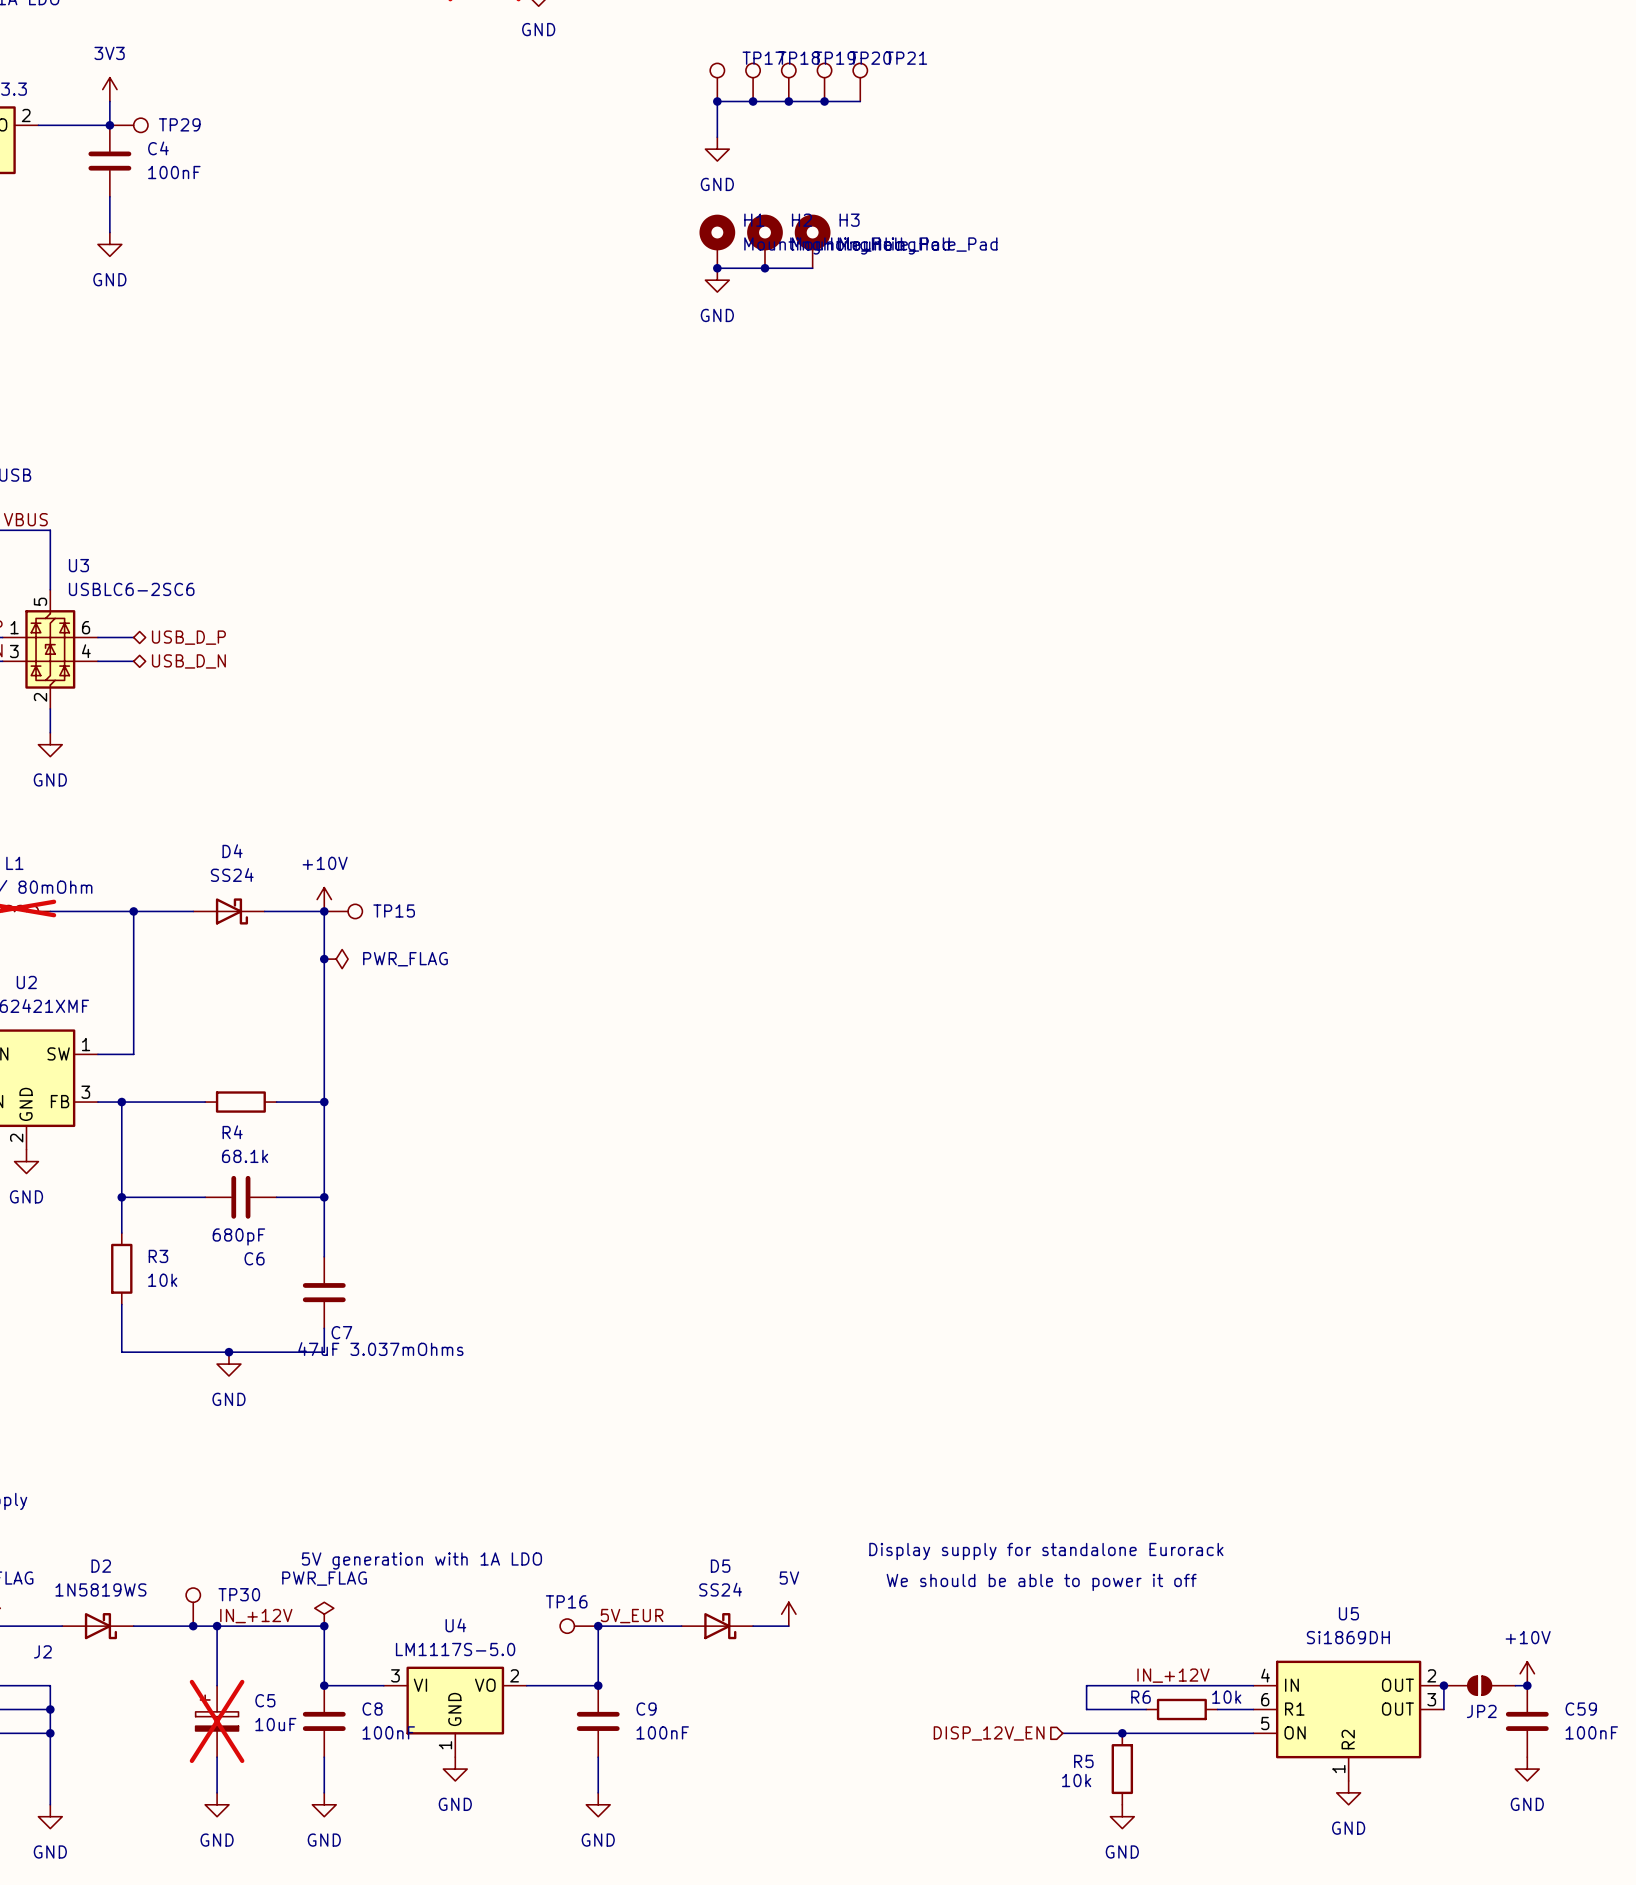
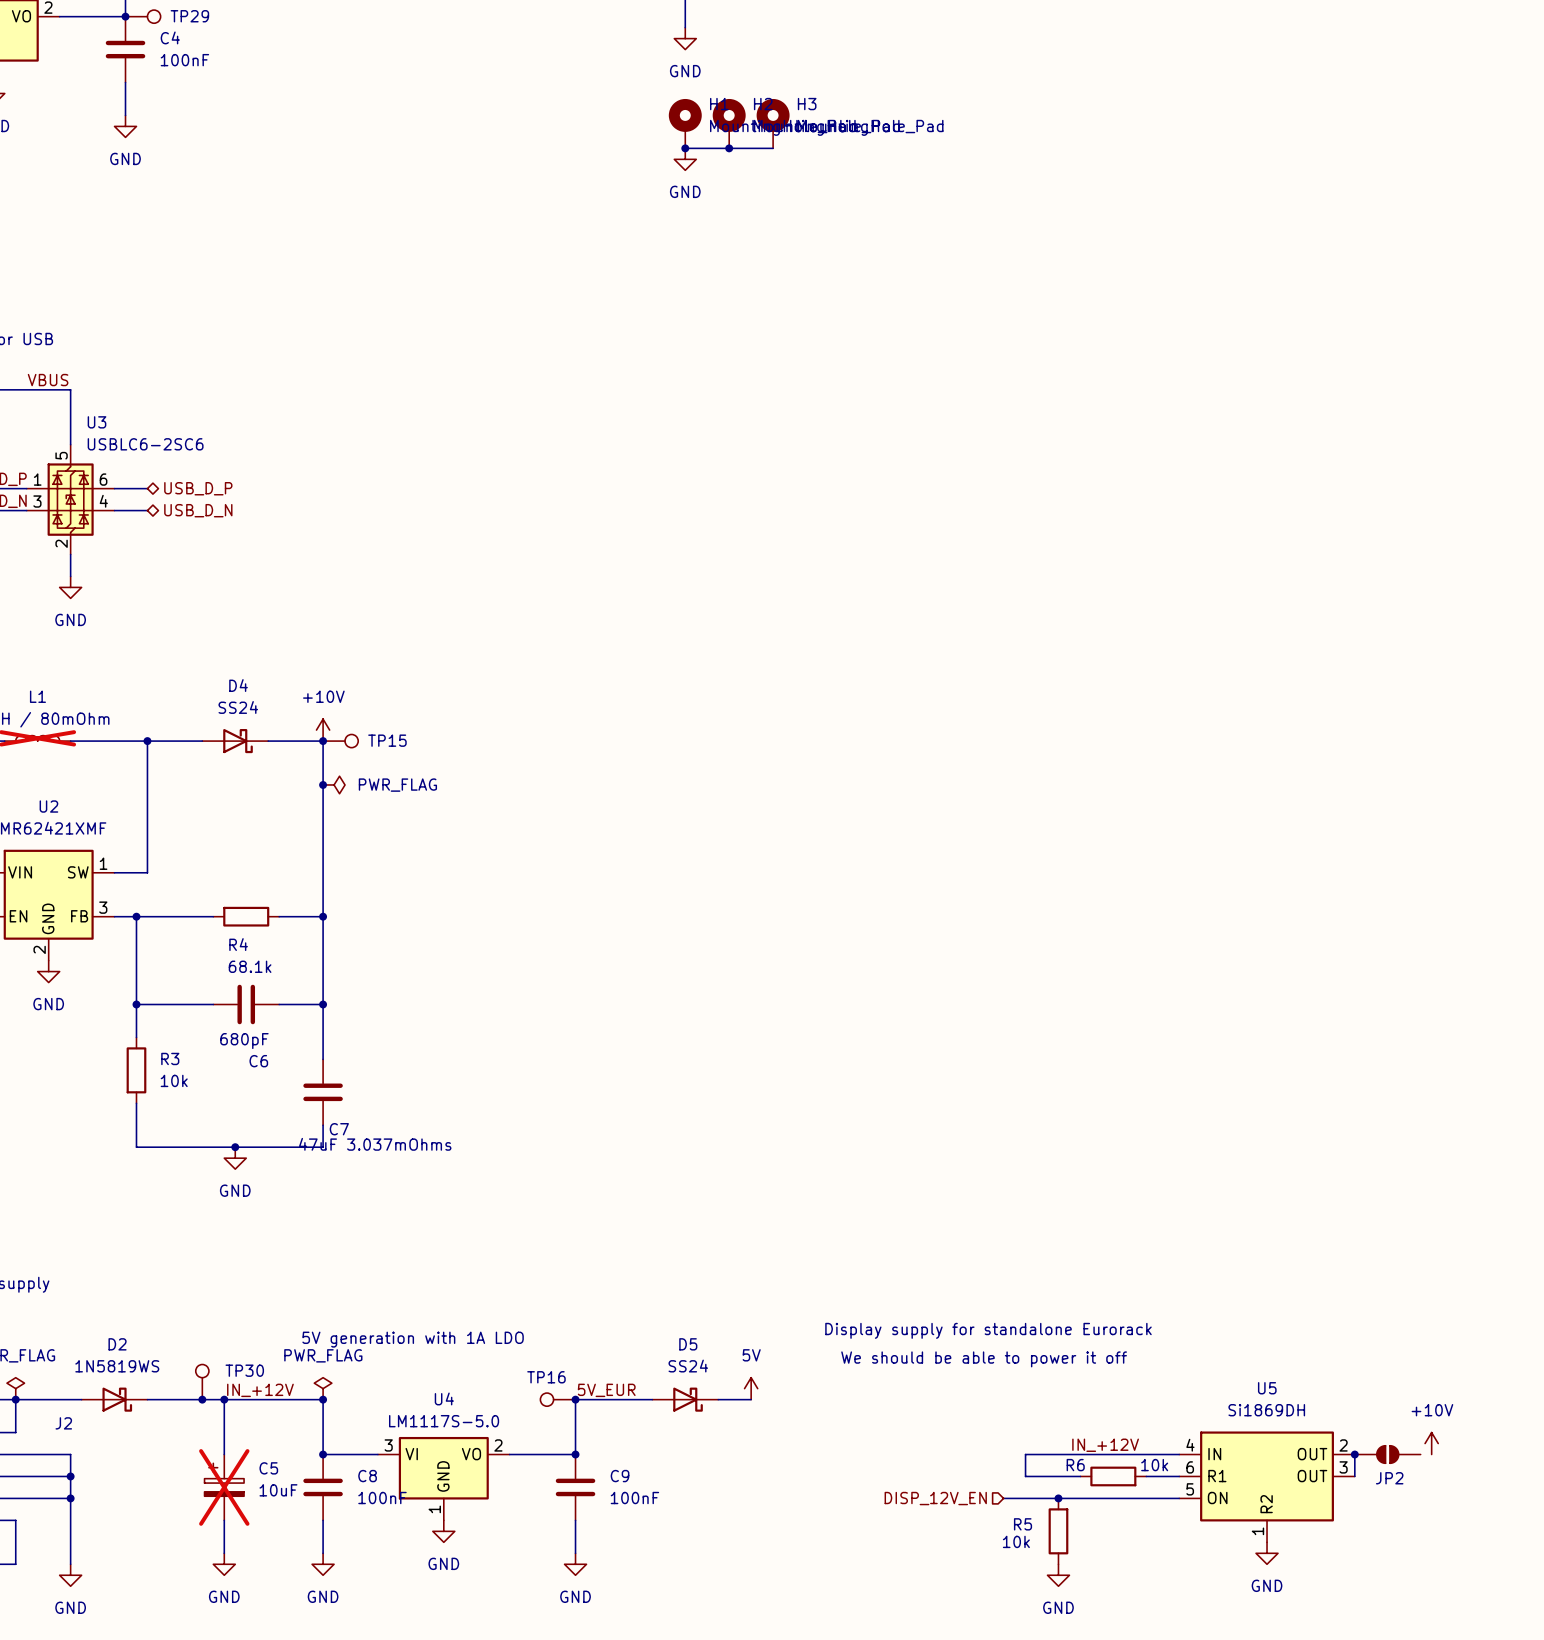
wire: (1515, 1685) (1527, 1685) -> none
junction: (1527, 1685) -> none
C59: 100nF (1527, 1721) -> none
power symbol: GND (1527, 1769) -> none

